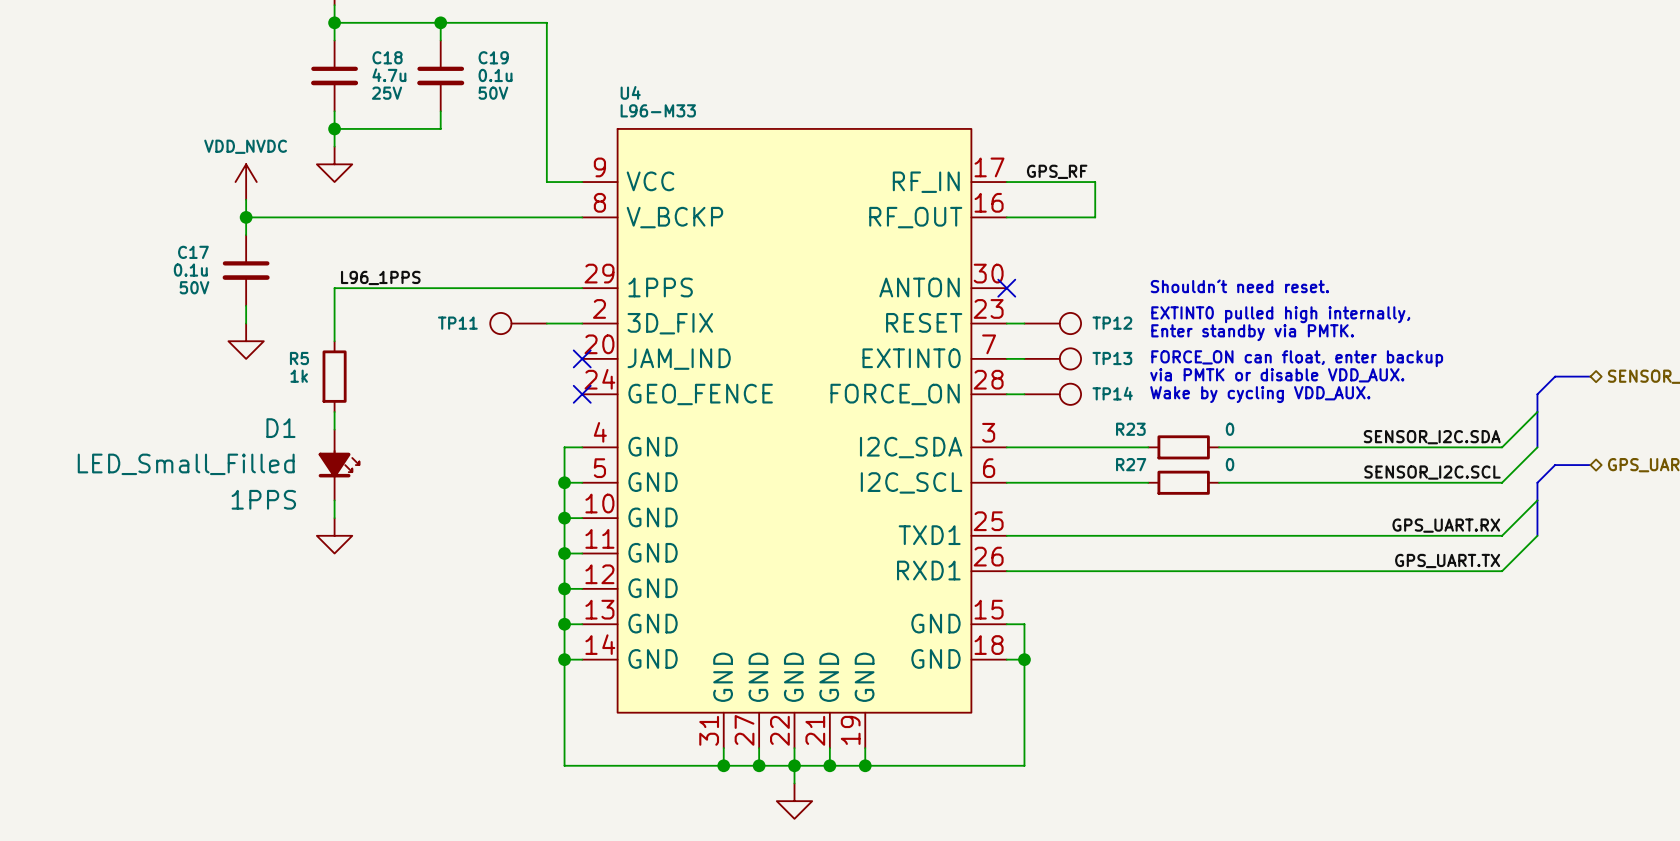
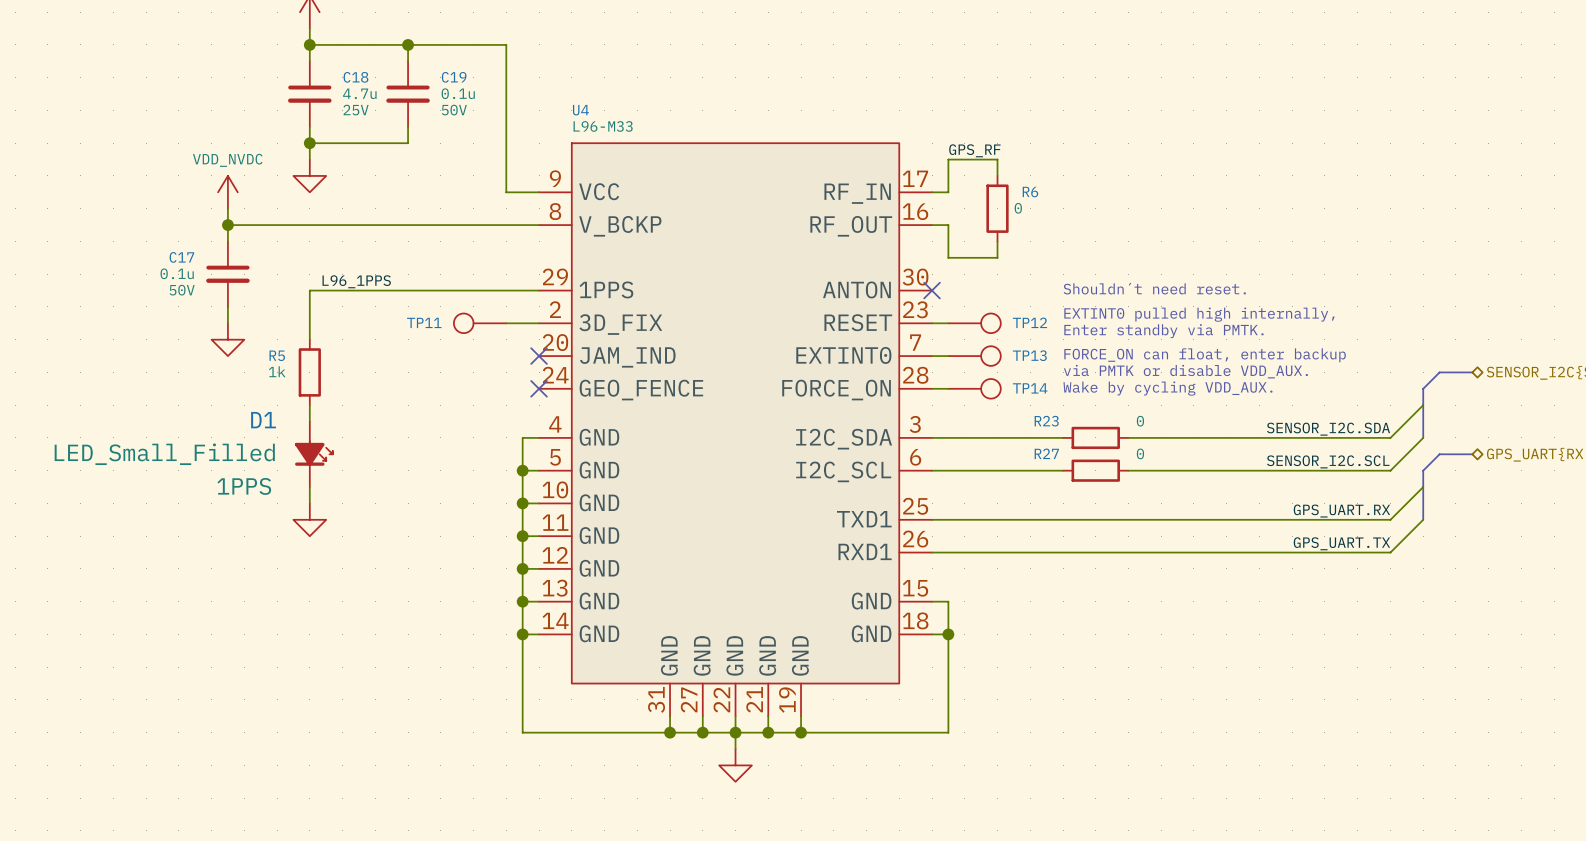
wire: none -> (997, 175) (997, 159) (948, 159) (948, 192)
label position: GPS_RF (1057, 171) -> GPS_RF (974, 150)
wire: (1024, 182) (1095, 182) (1095, 217) (1024, 217) -> (997, 241) (997, 257) (948, 257) (948, 225)
R6: none -> 0 (997, 208)

